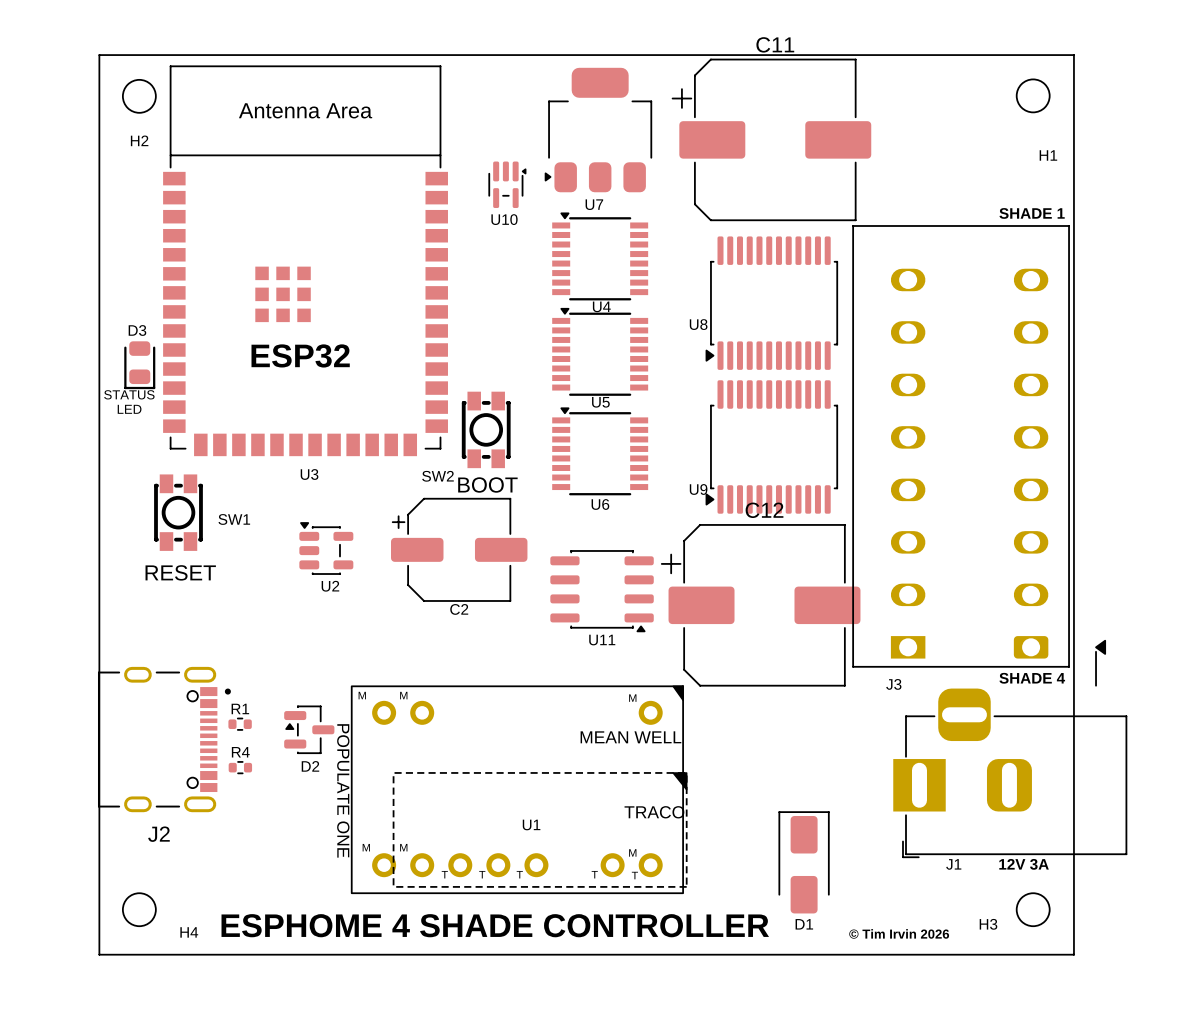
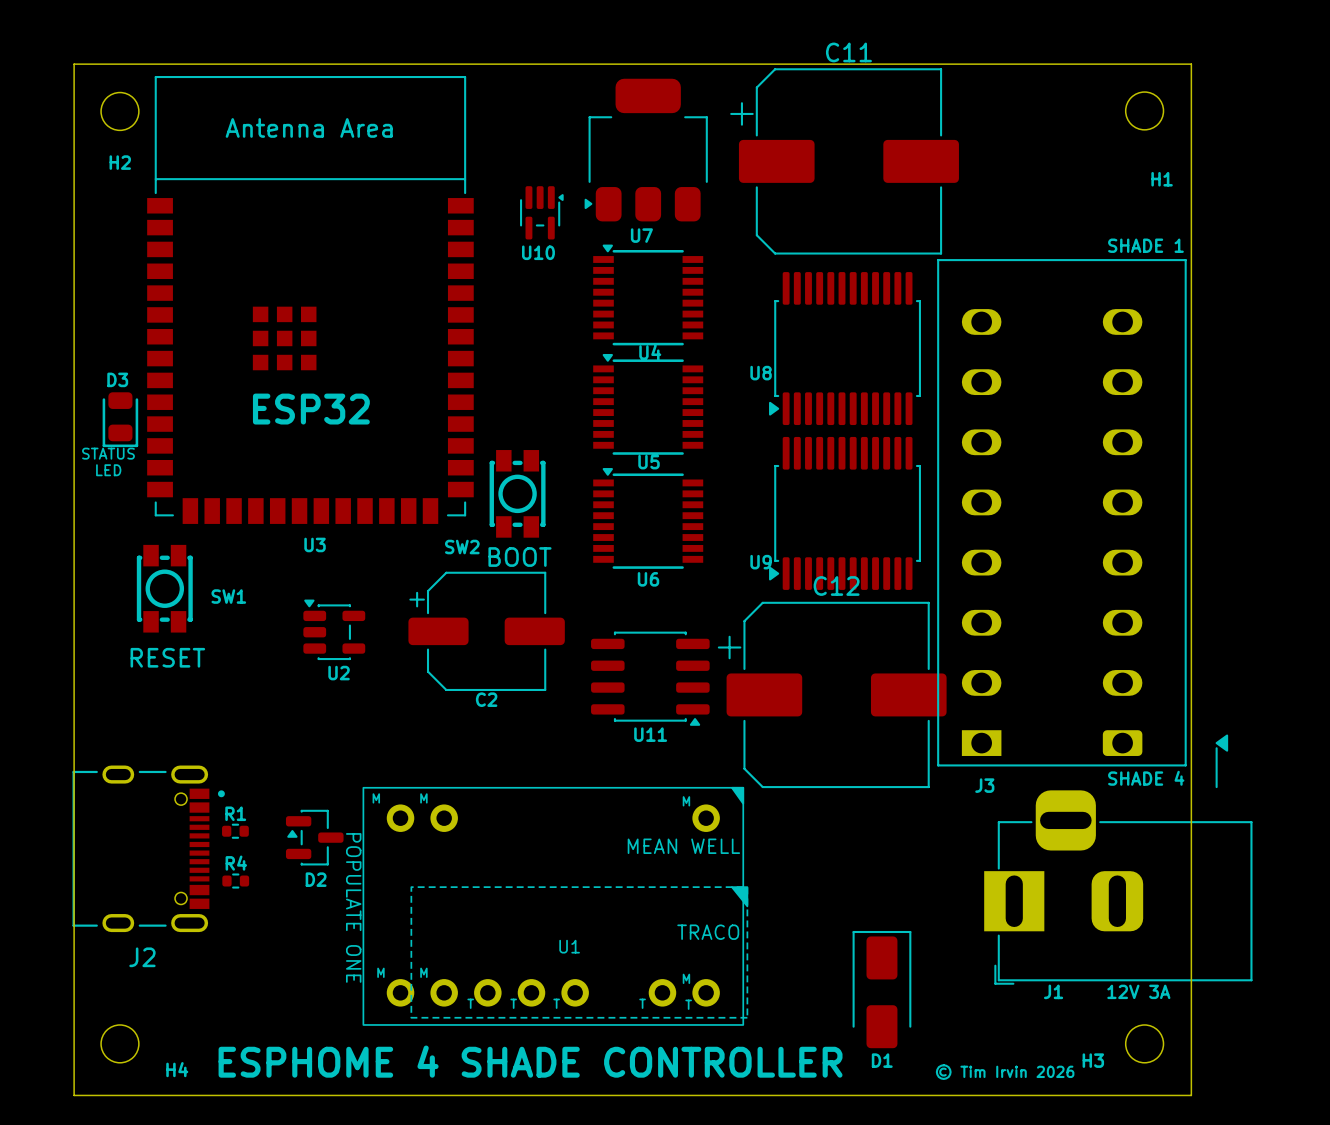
J3 footprint: [852, 225, 1107, 687] -> [937, 259, 1229, 789]

